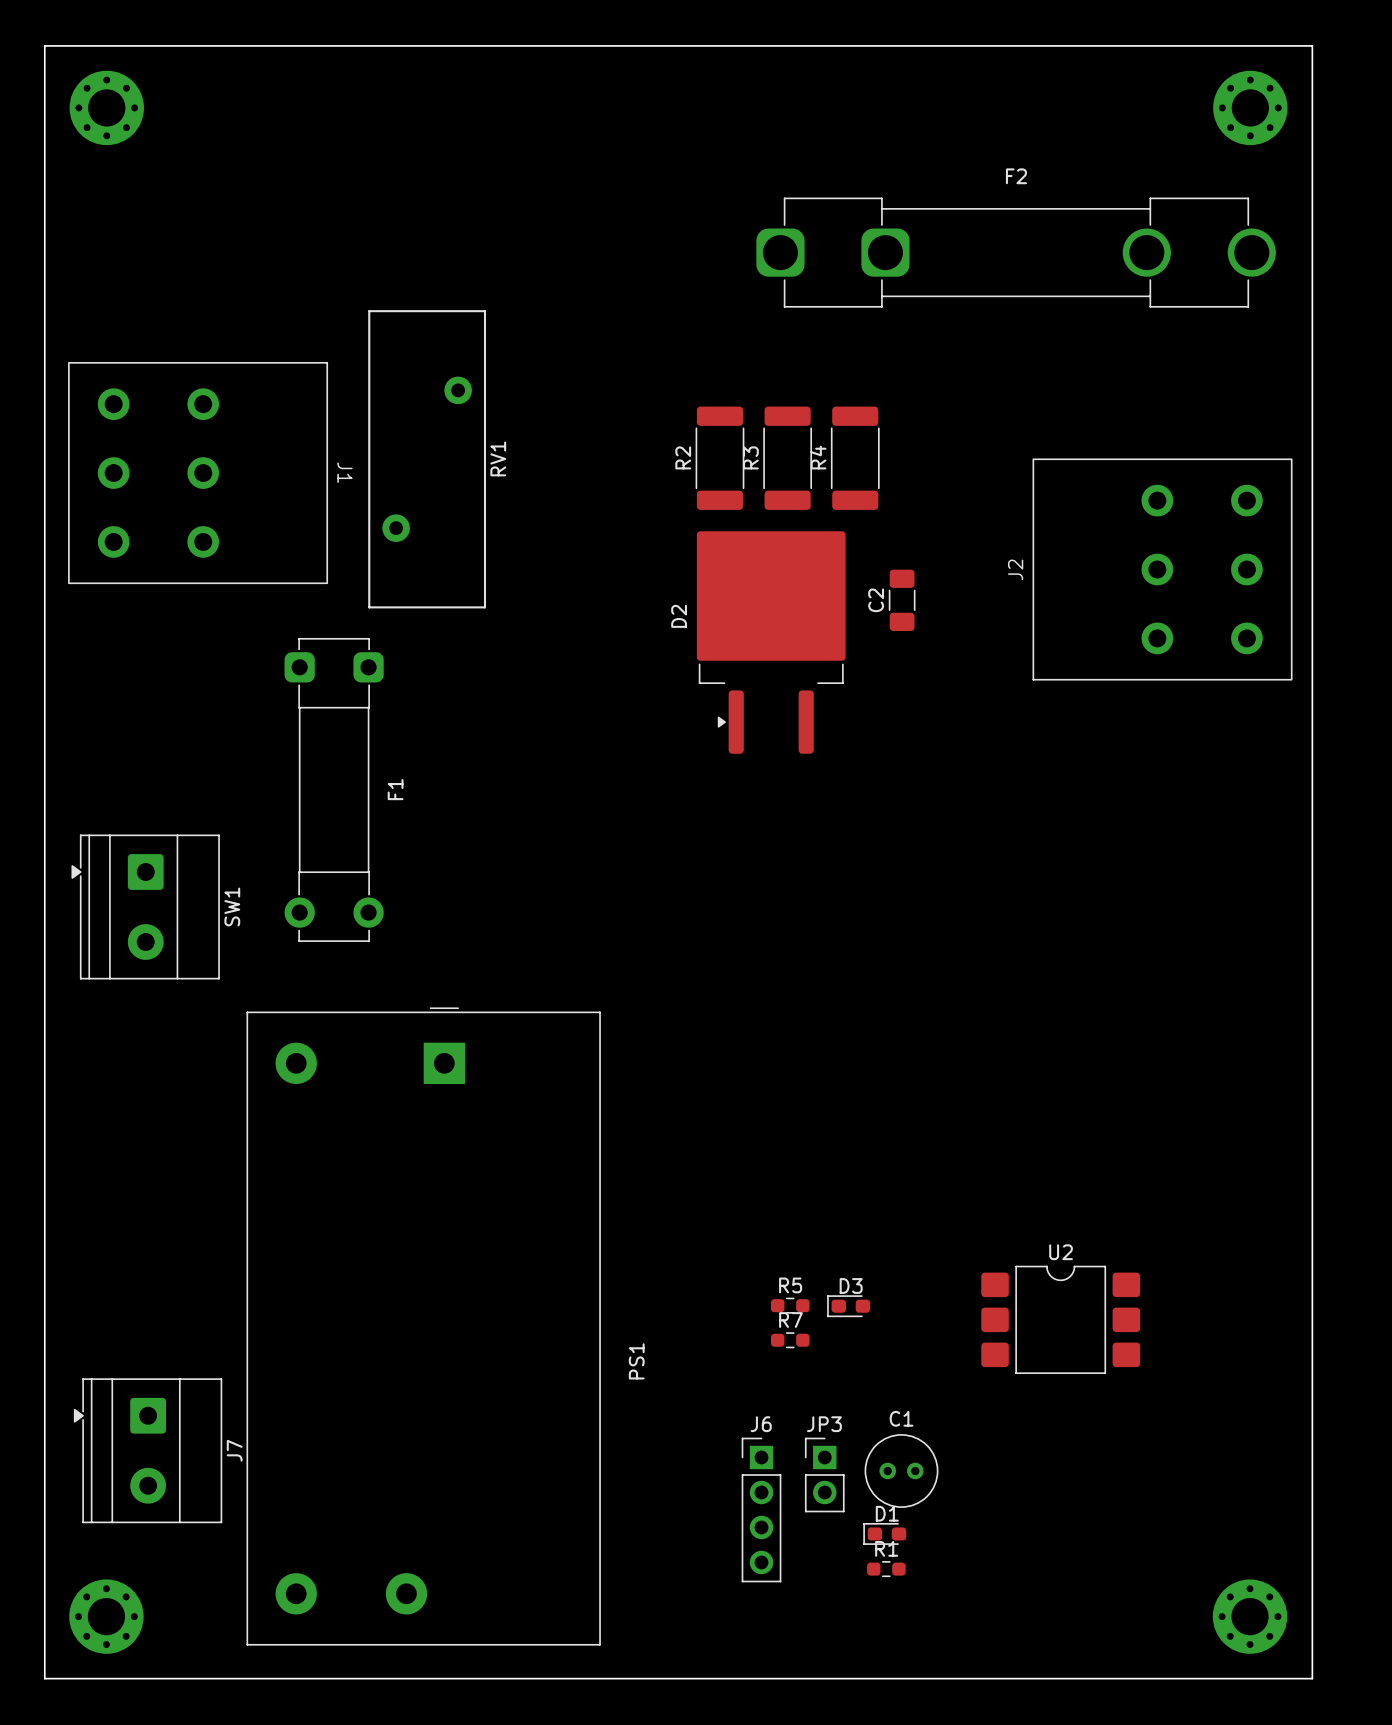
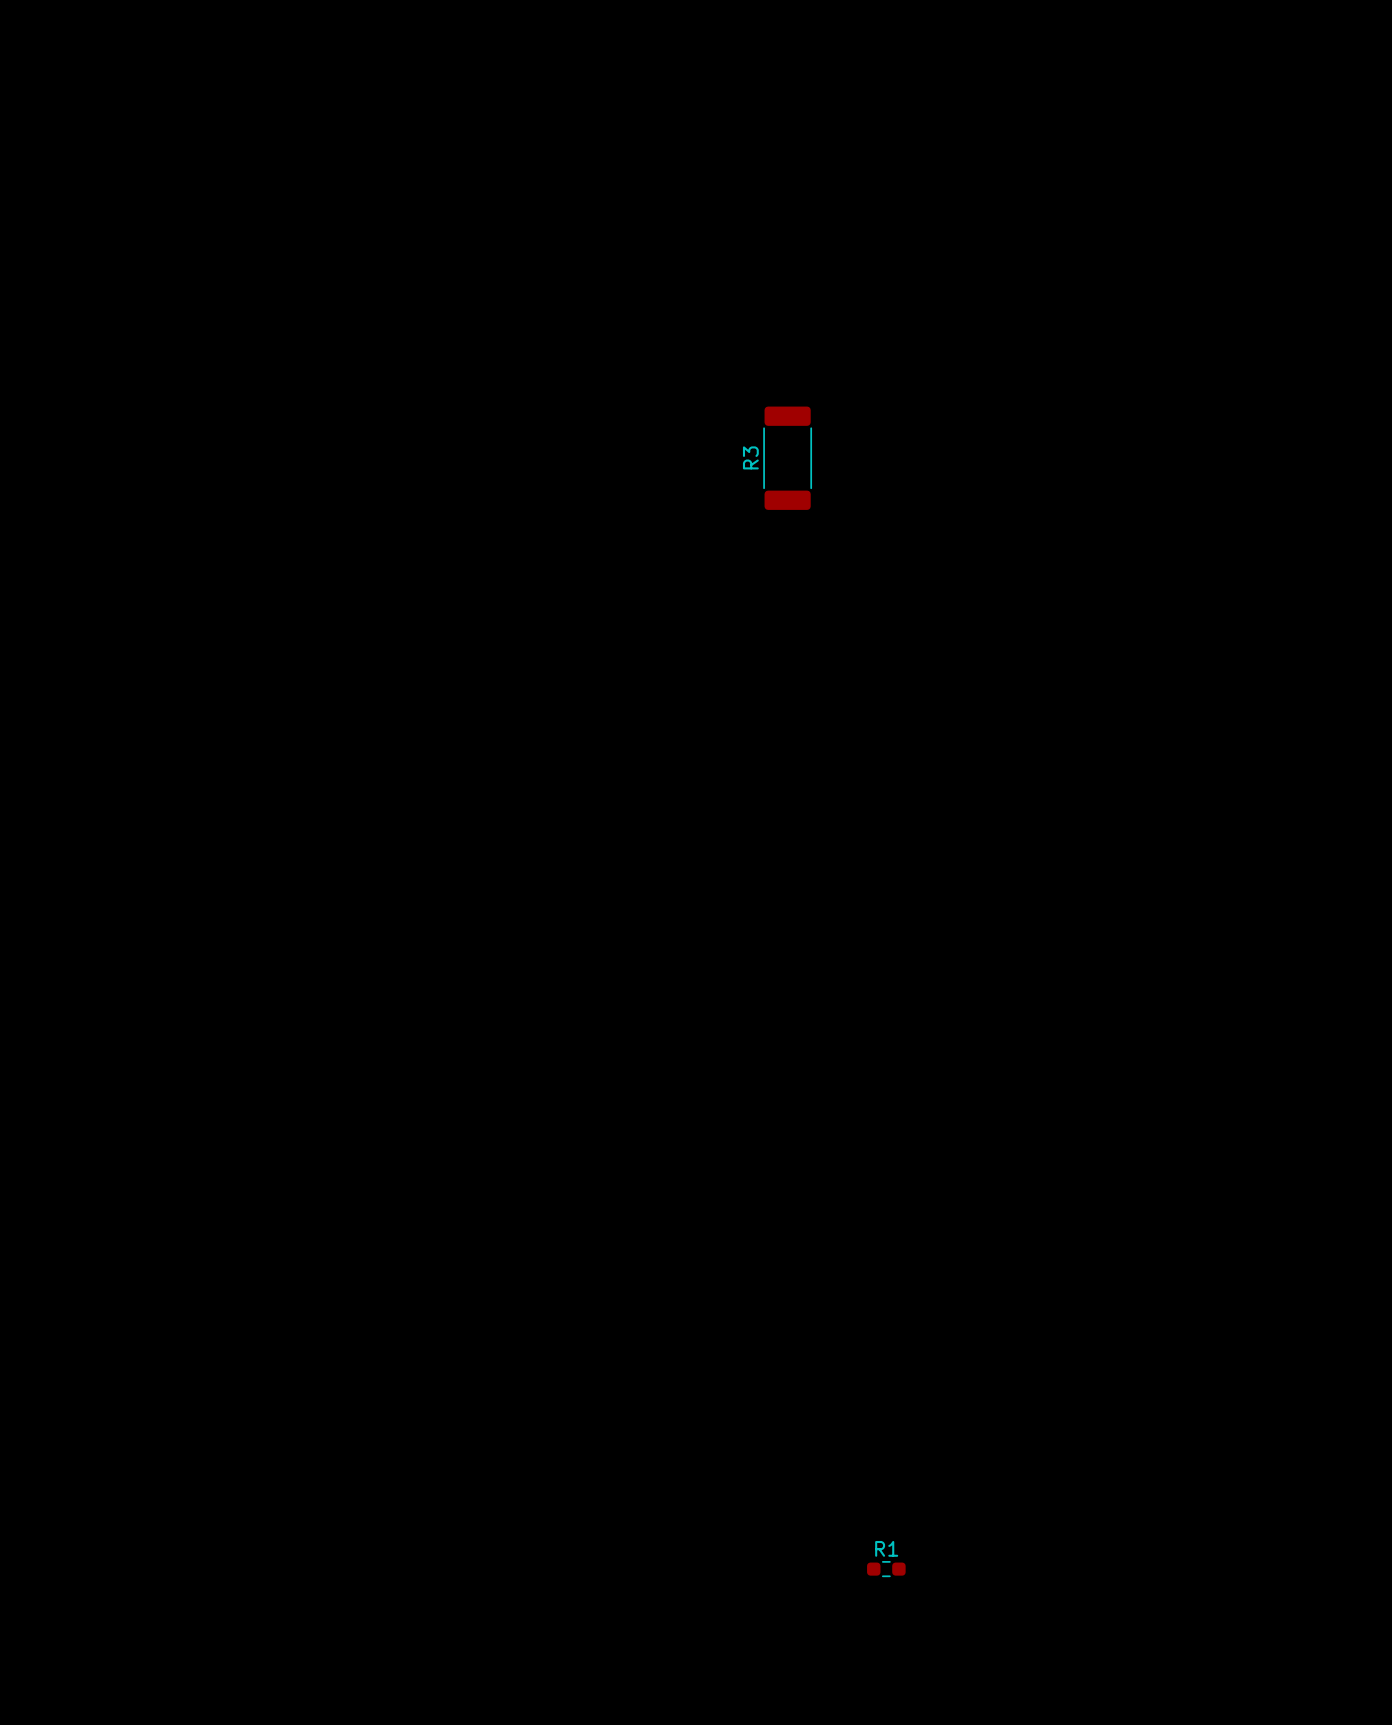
board edge: (44, 45) (1312, 45) (1312, 1678) (44, 1678) (44, 45) -> none
part: (106, 107) -> none
part: (1250, 107) -> none
F2: (1016, 252) -> none
R2: (719, 458) -> none
R4: (855, 458) -> none
RV1: (427, 459) -> none
J1: (198, 473) -> none
J2: (1162, 569) -> none
C2: (902, 600) -> none
D2: (771, 642) -> none
F1: (334, 789) -> none
SW1: (145, 906) -> none
R5: (790, 1305) -> none
D3: (848, 1306) -> none
U2: (1060, 1319) -> none
PS1: (423, 1326) -> none
R7: (790, 1340) -> none
J7: (148, 1450) -> none
C1: (901, 1470) -> none
JP3: (824, 1474) -> none
J6: (761, 1509) -> none
D1: (884, 1533) -> none
part: (106, 1616) -> none
part: (1250, 1616) -> none

